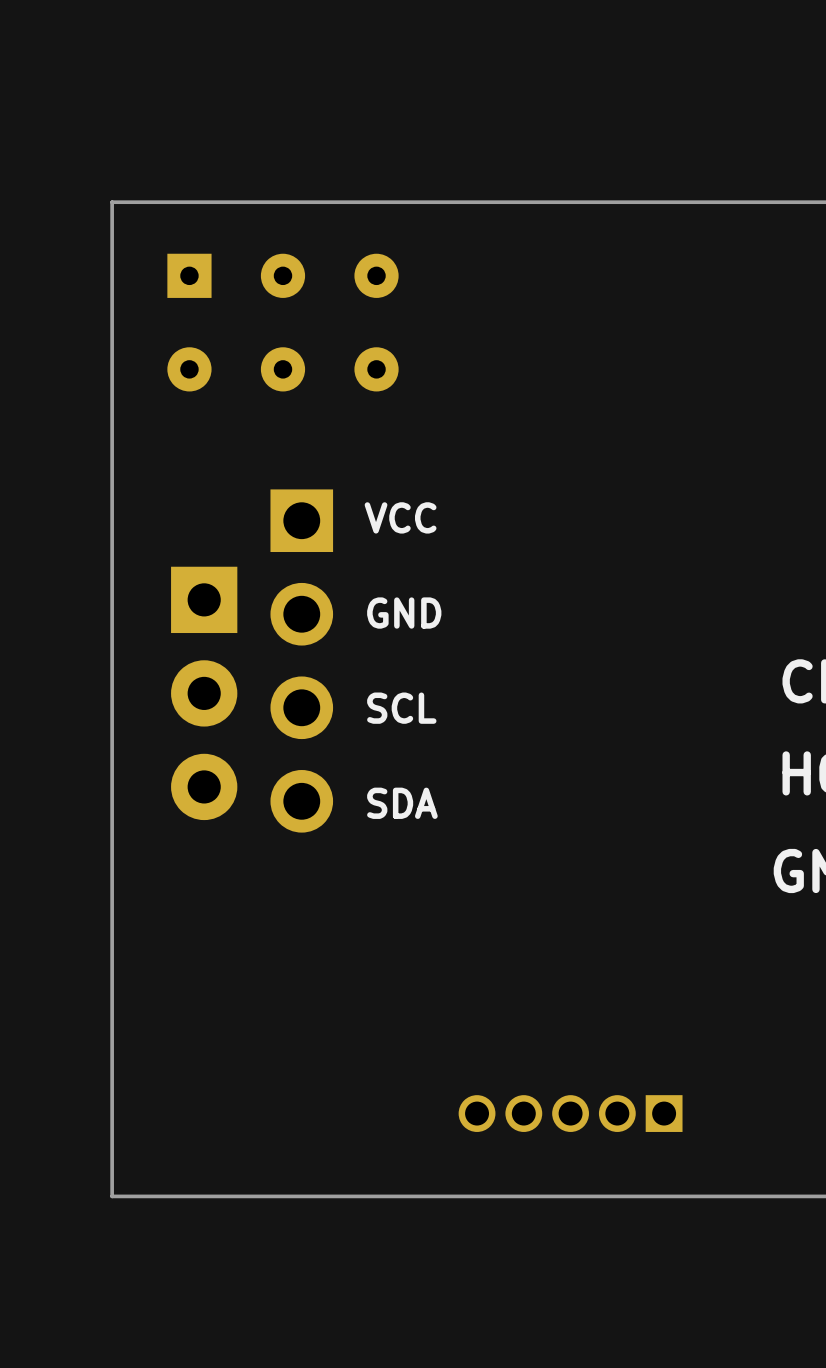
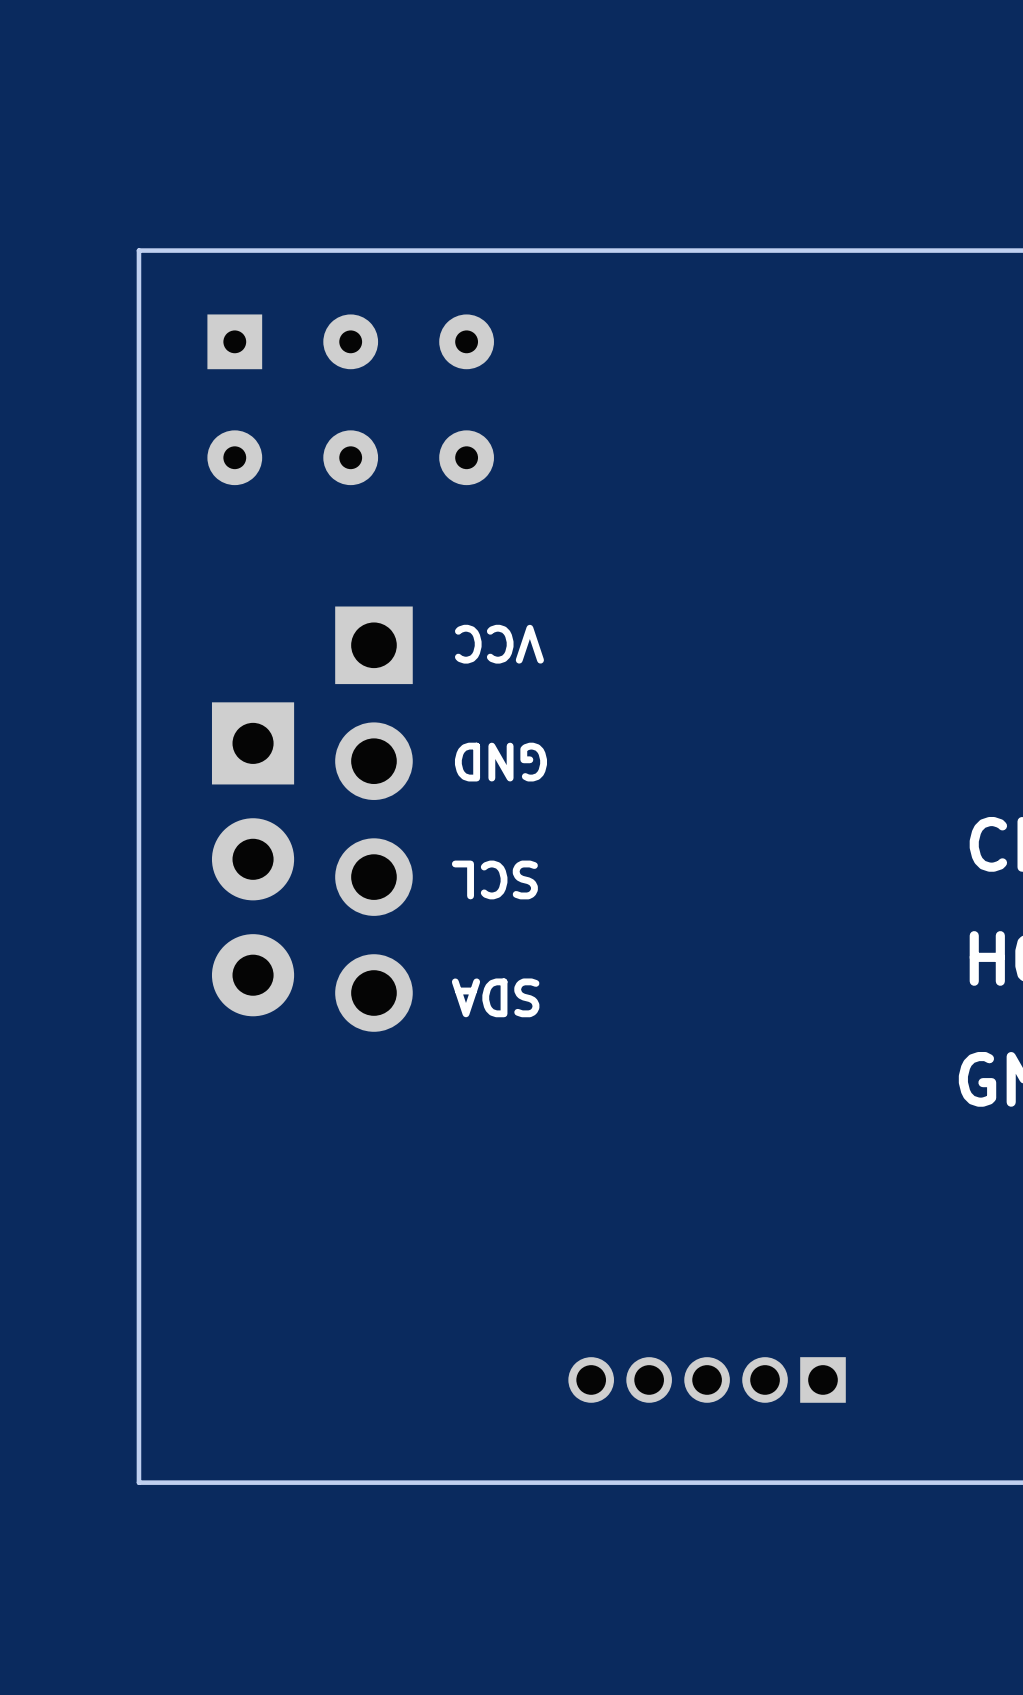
text rotation: 0° (400, 517) -> 180° (499, 644)
text rotation: 0° (404, 613) -> 180° (500, 762)
text rotation: 0° (401, 708) -> 180° (494, 879)
text rotation: 0° (402, 803) -> 180° (495, 997)

